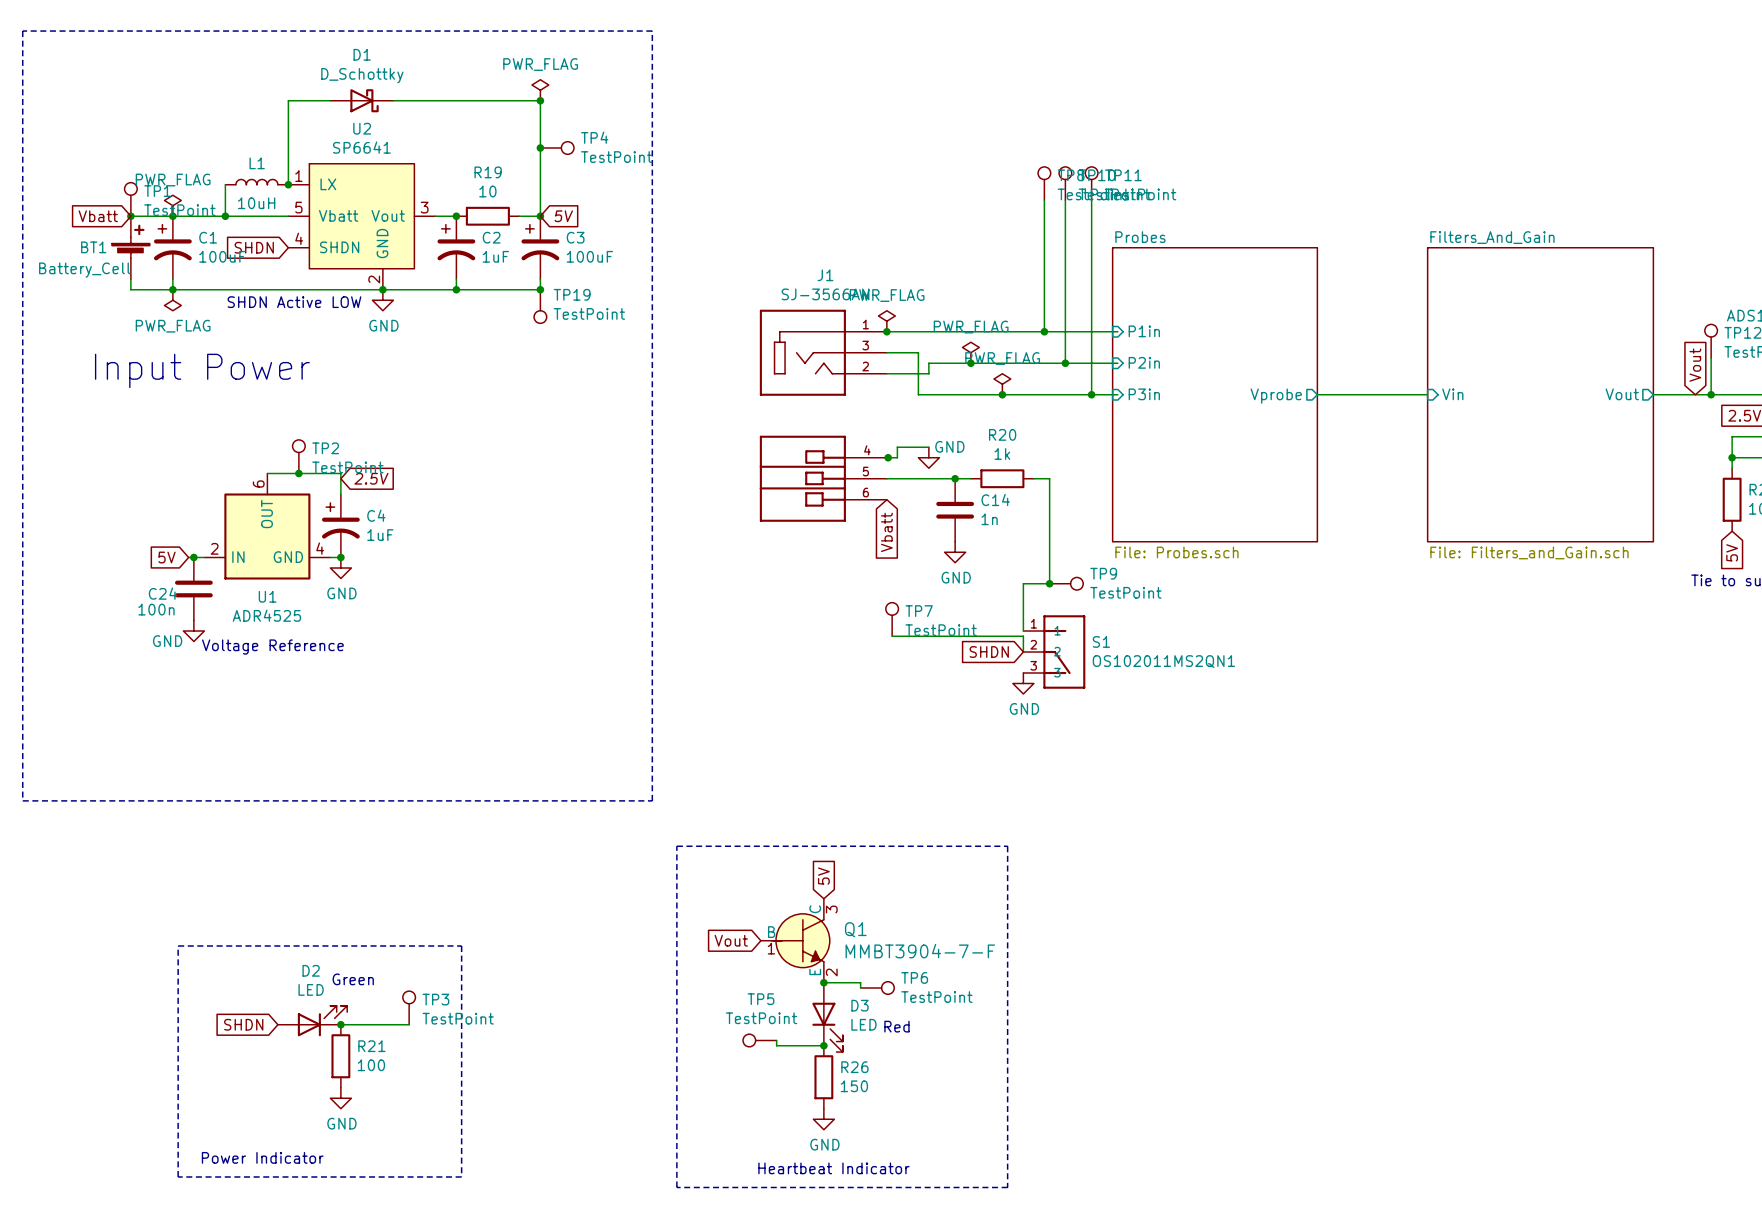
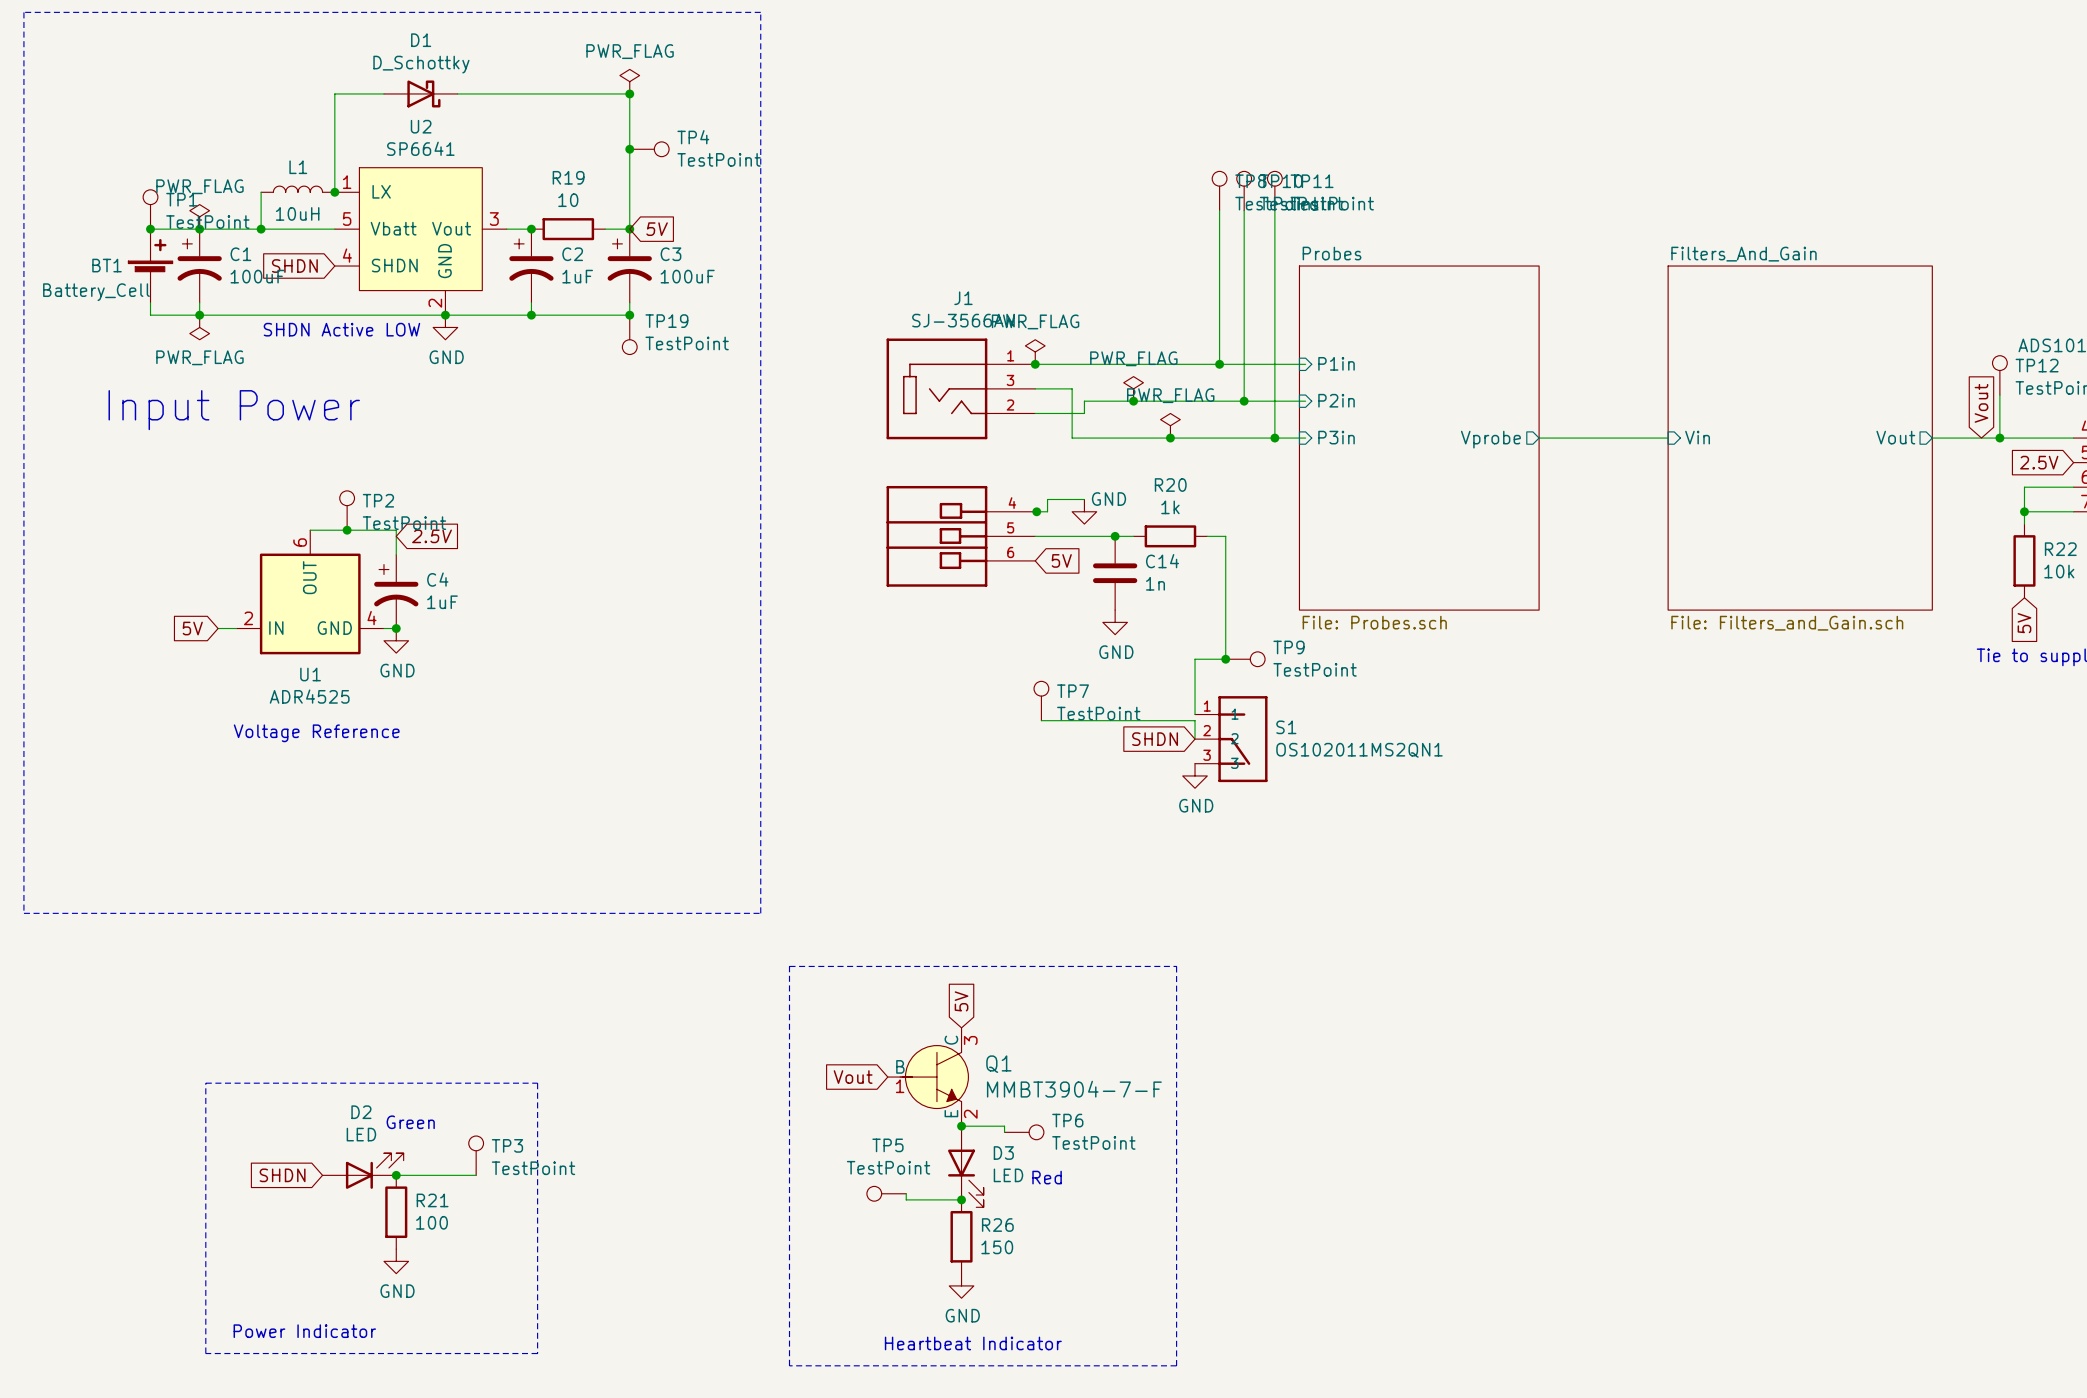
global label: Vbatt (98, 216) -> none
global label: Vbatt (886, 532) -> 5V (1061, 560)
junction: (193, 557) -> none
C24: 100n (193, 589) -> none
power symbol: GND (193, 631) -> none

